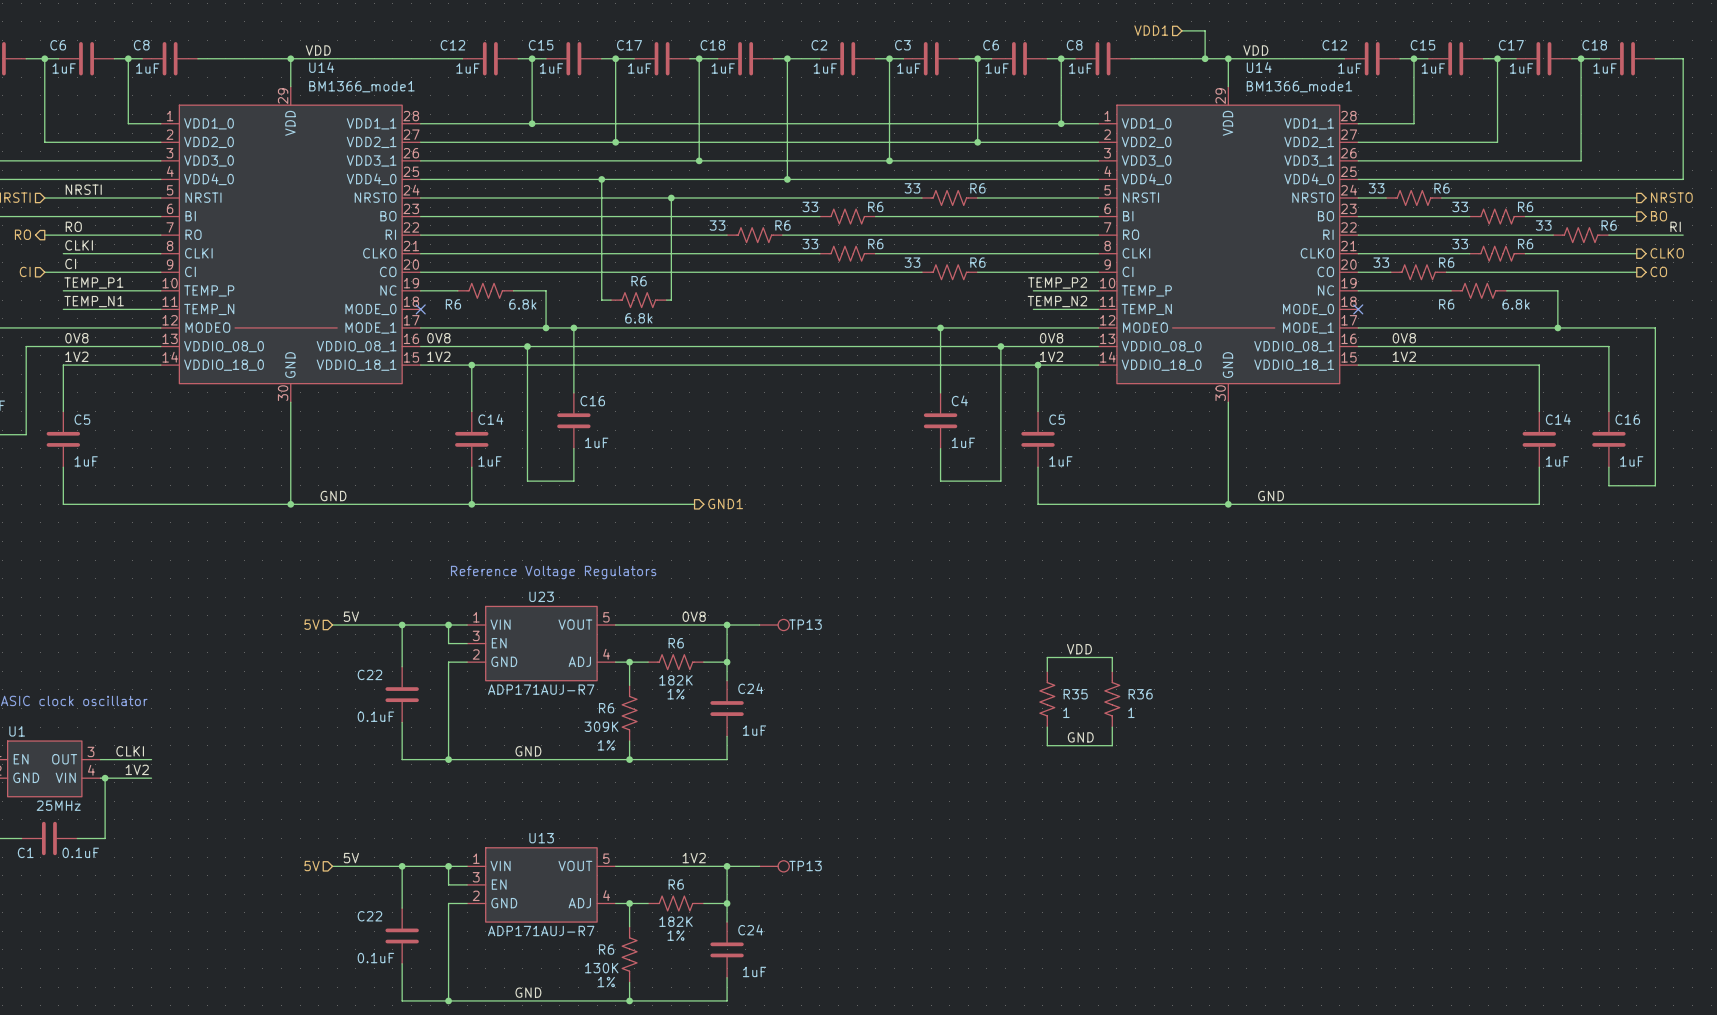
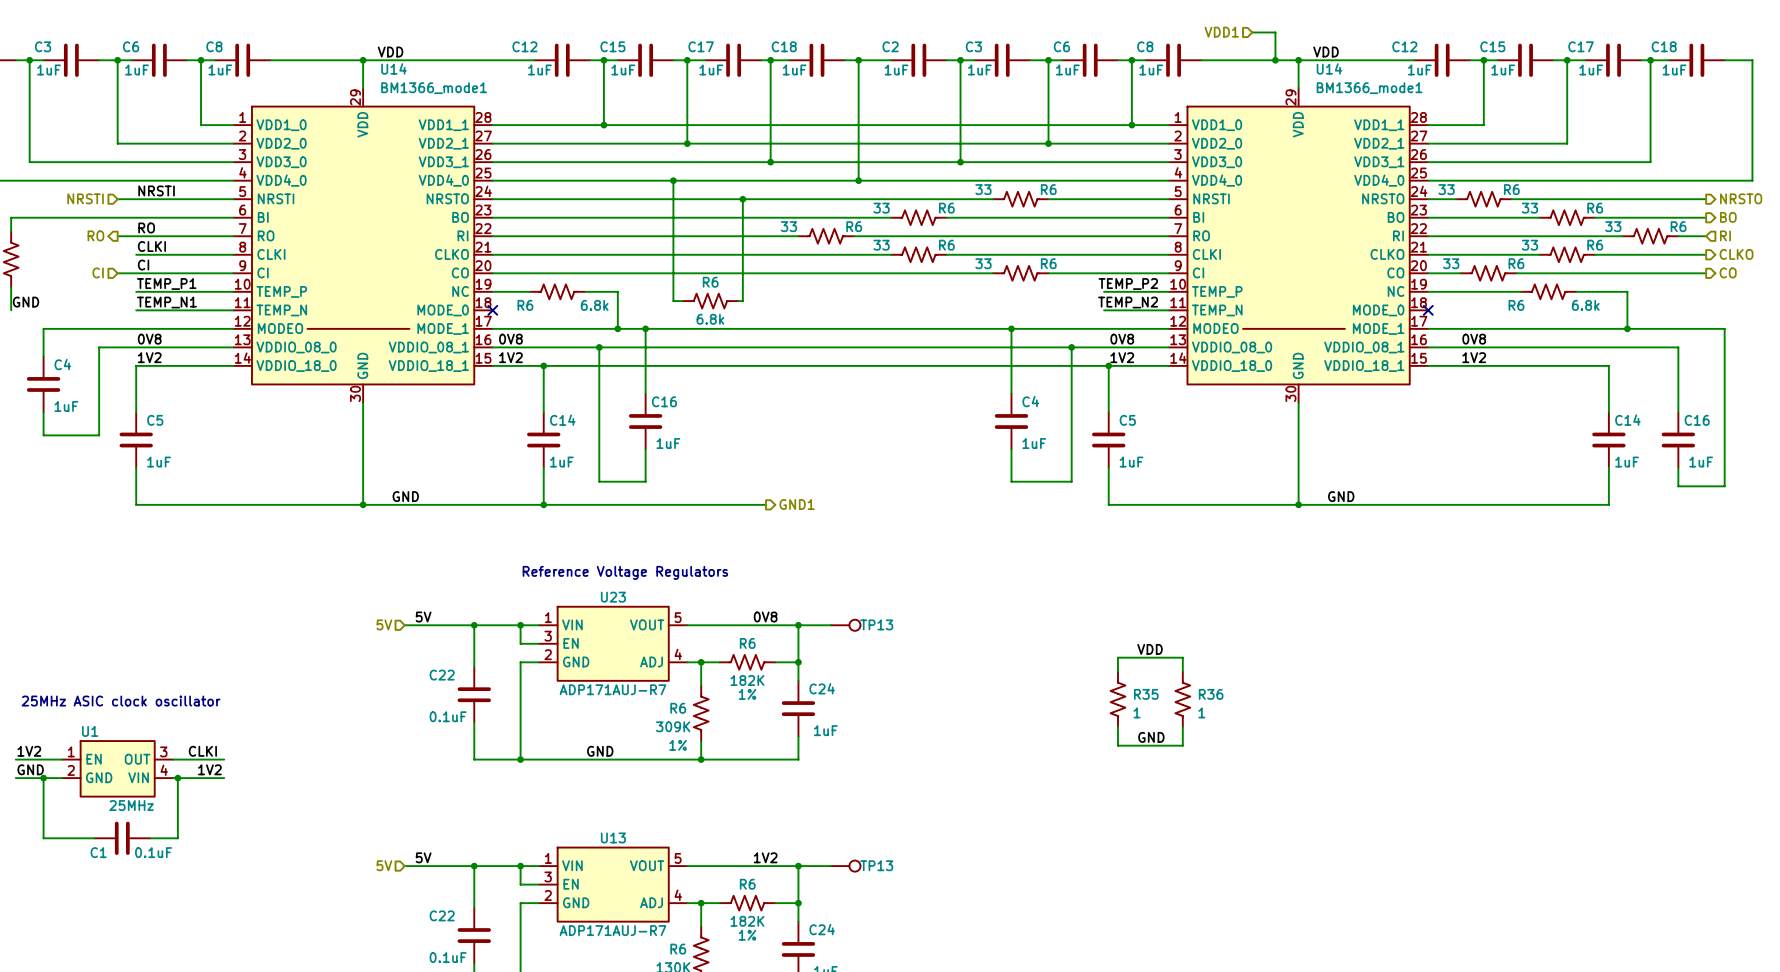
label: RI (1675, 226) -> none
hierarchical label: none -> RI (1725, 235)
wire: (1636, 235) (1683, 235) -> none

